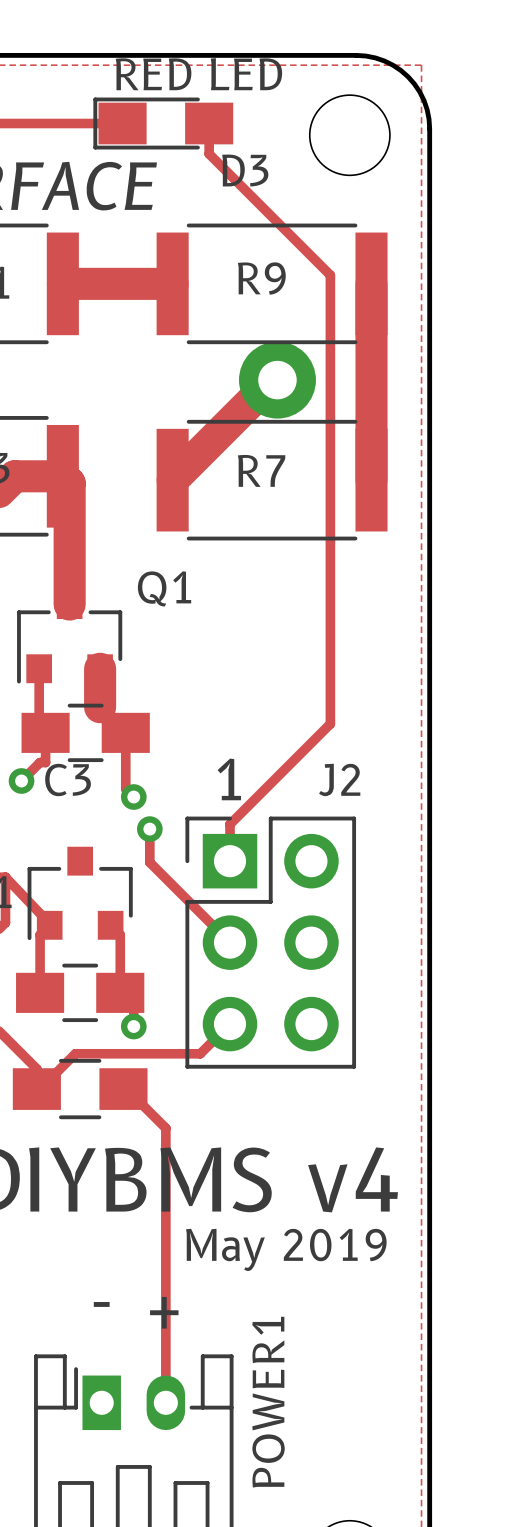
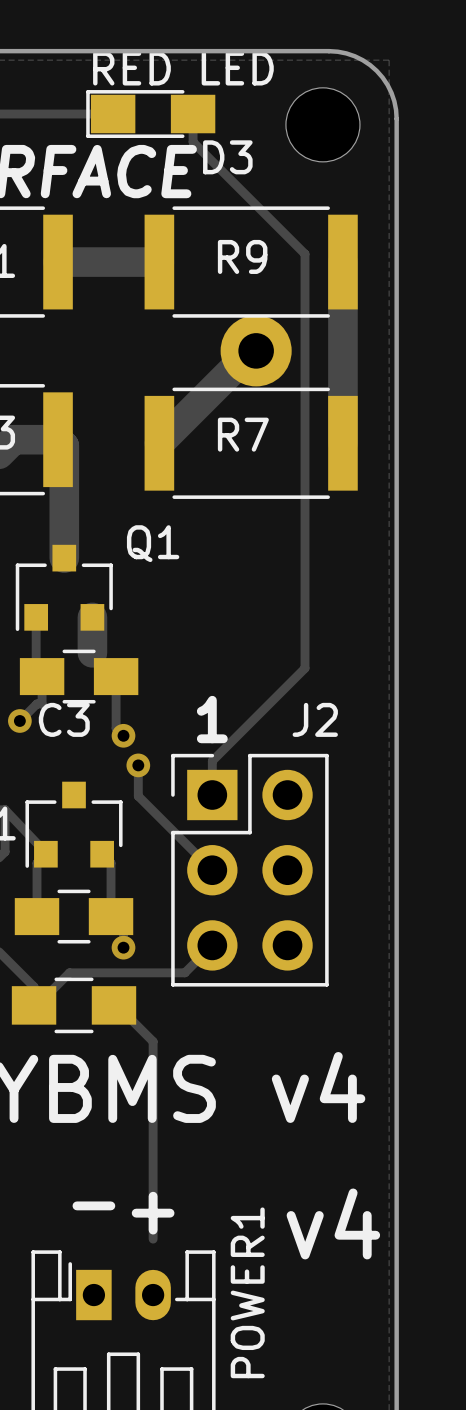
text: May 2019 (286, 1249) -> none
text: none -> v4 (333, 1223)
track: (165, 1342) (165, 1402) -> none

